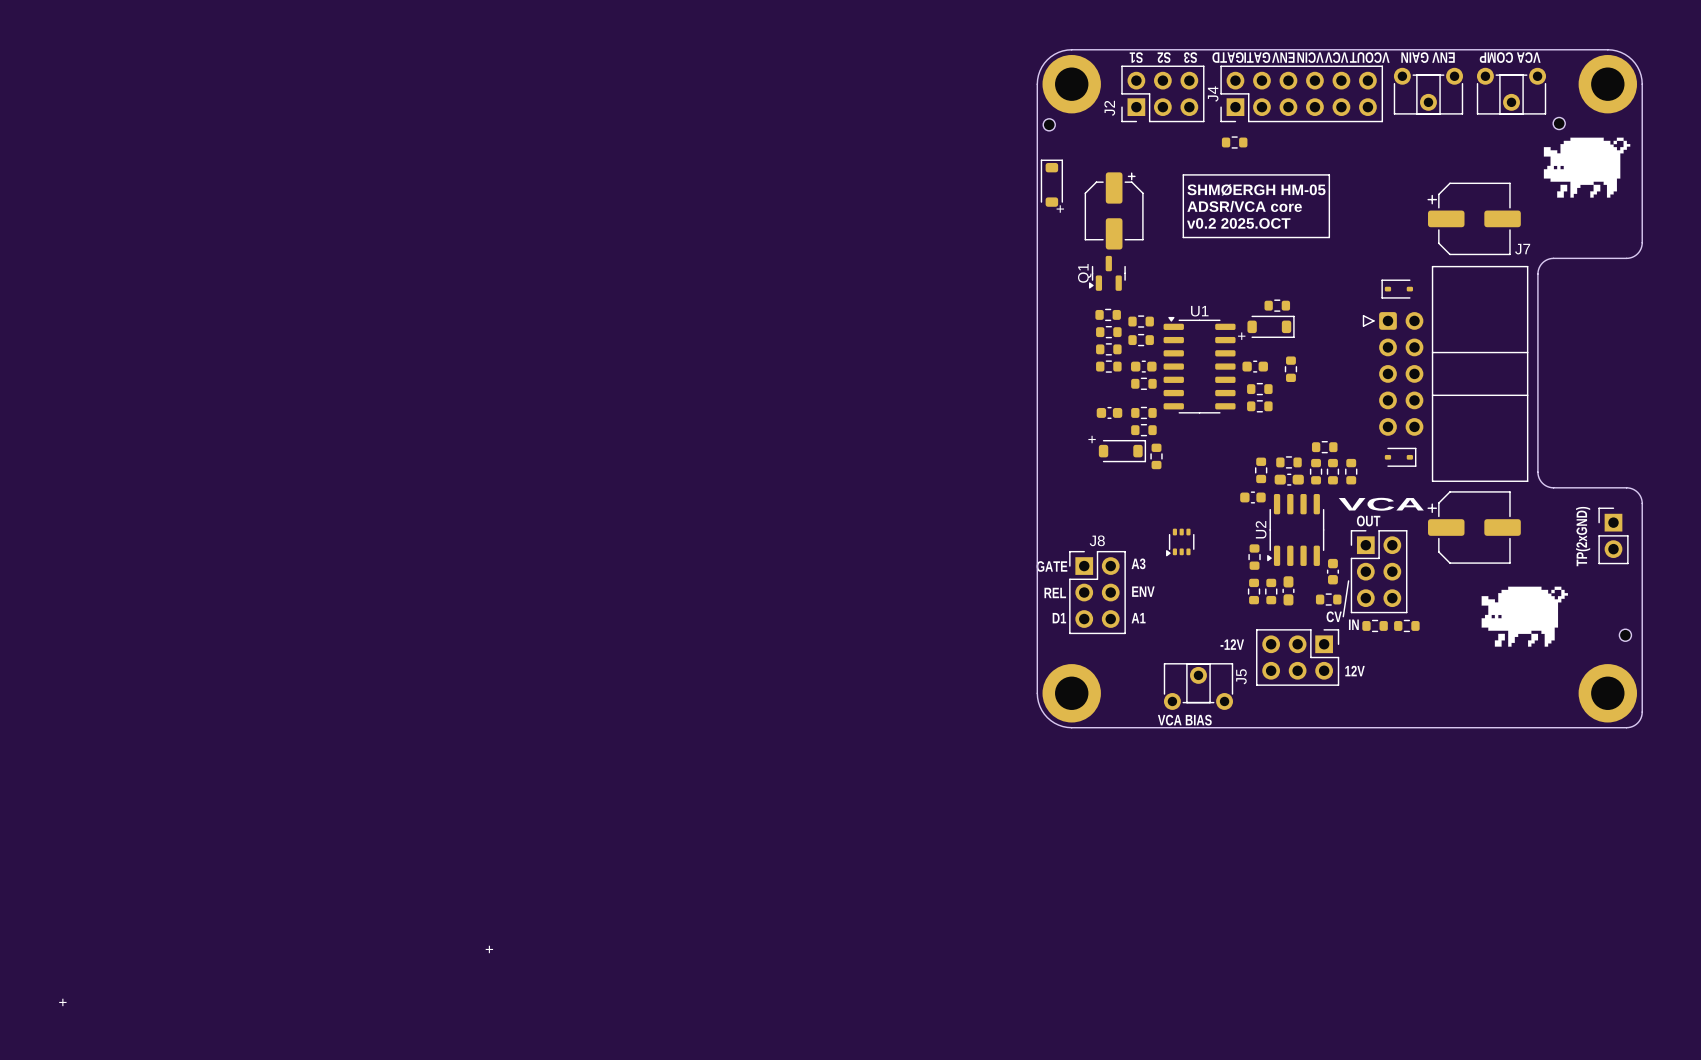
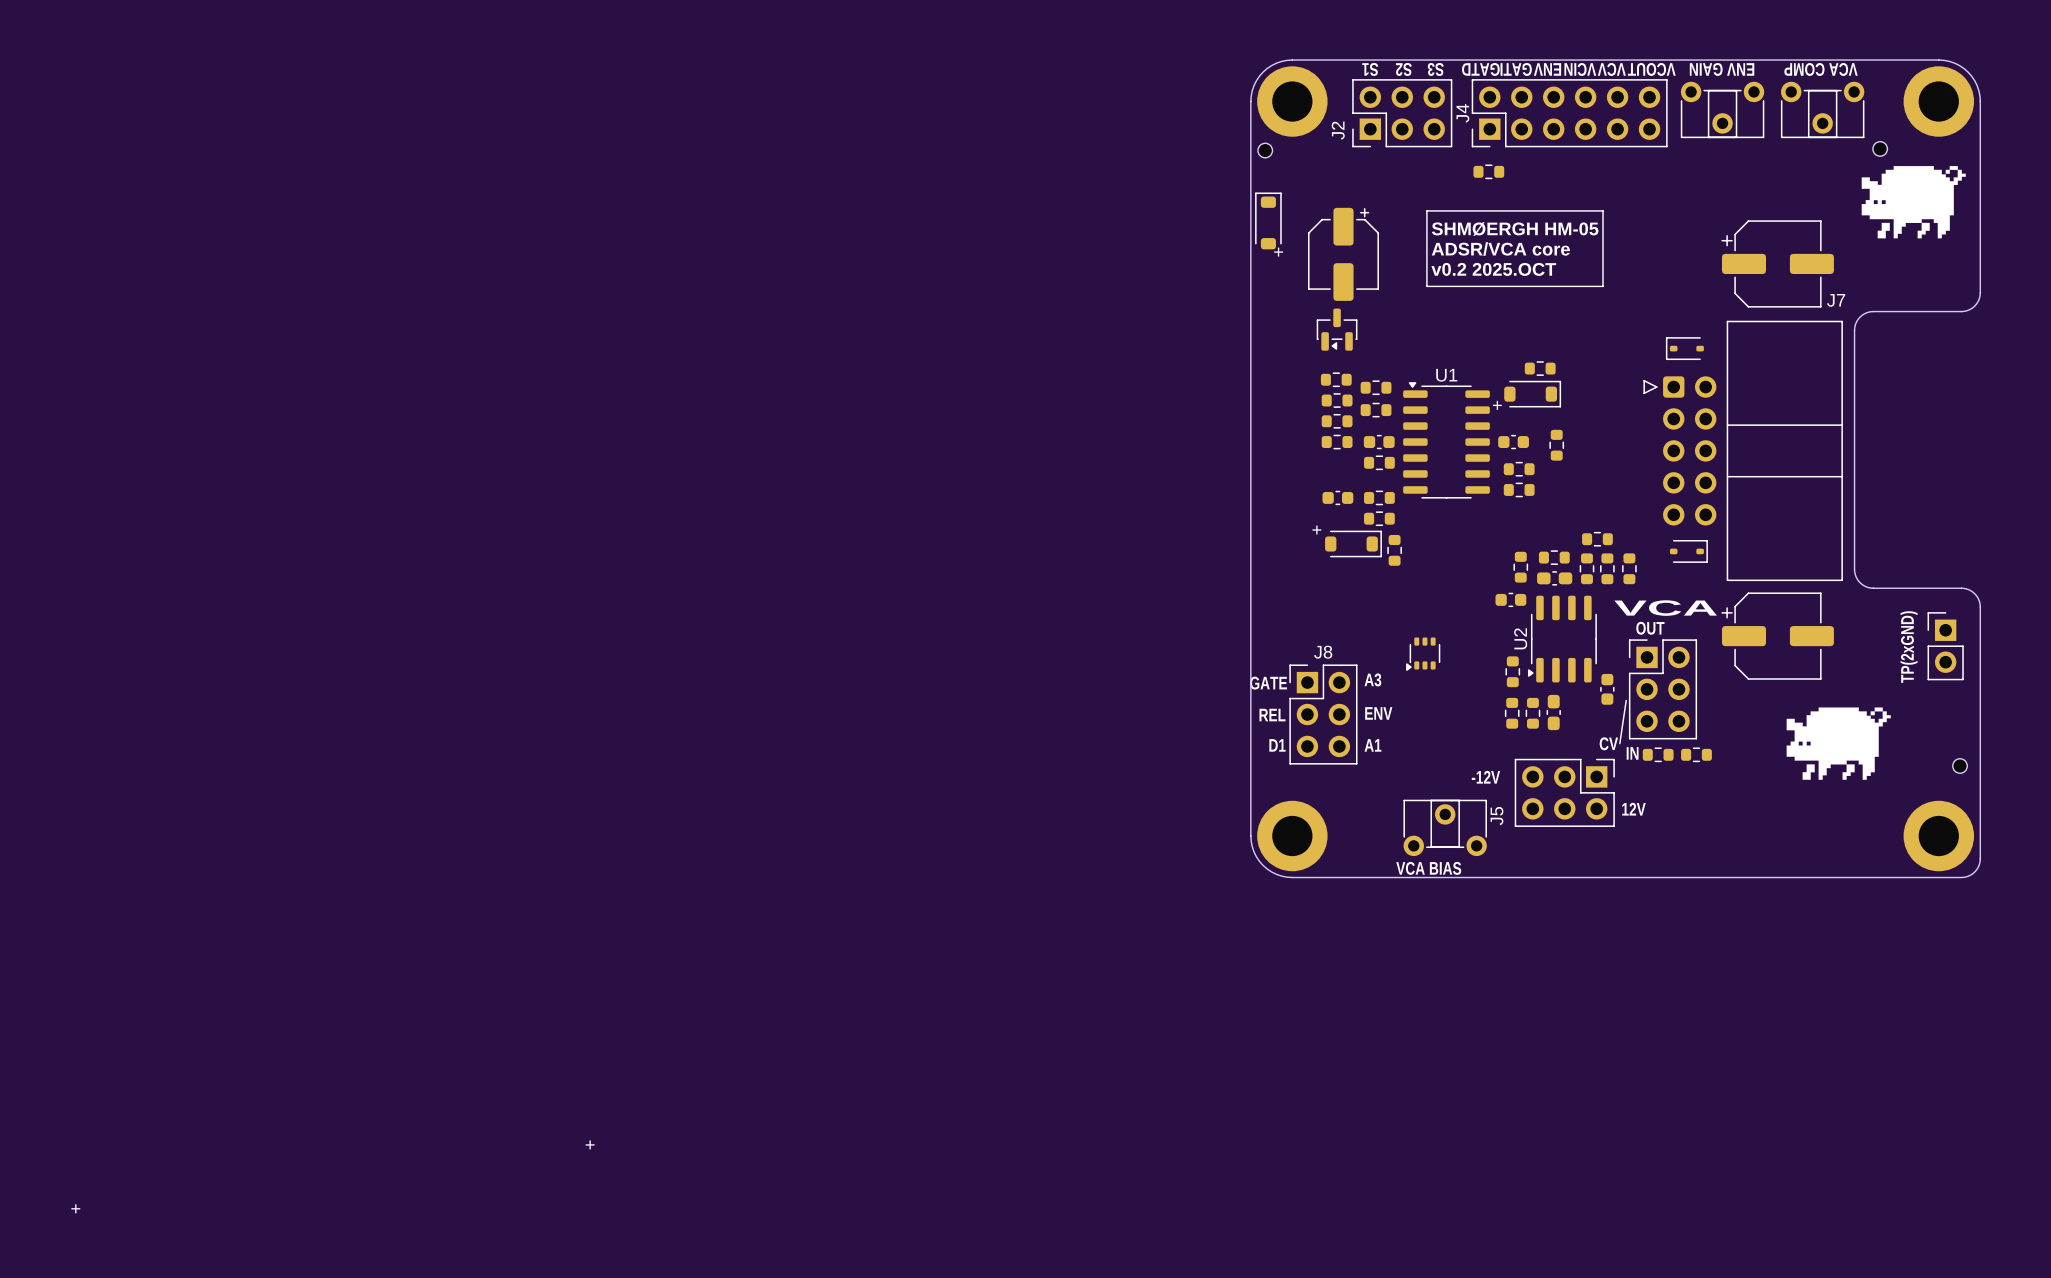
Q1: (1107, 273) -> none
part: none -> (1337, 329)
part: (1328, 599) -> none

